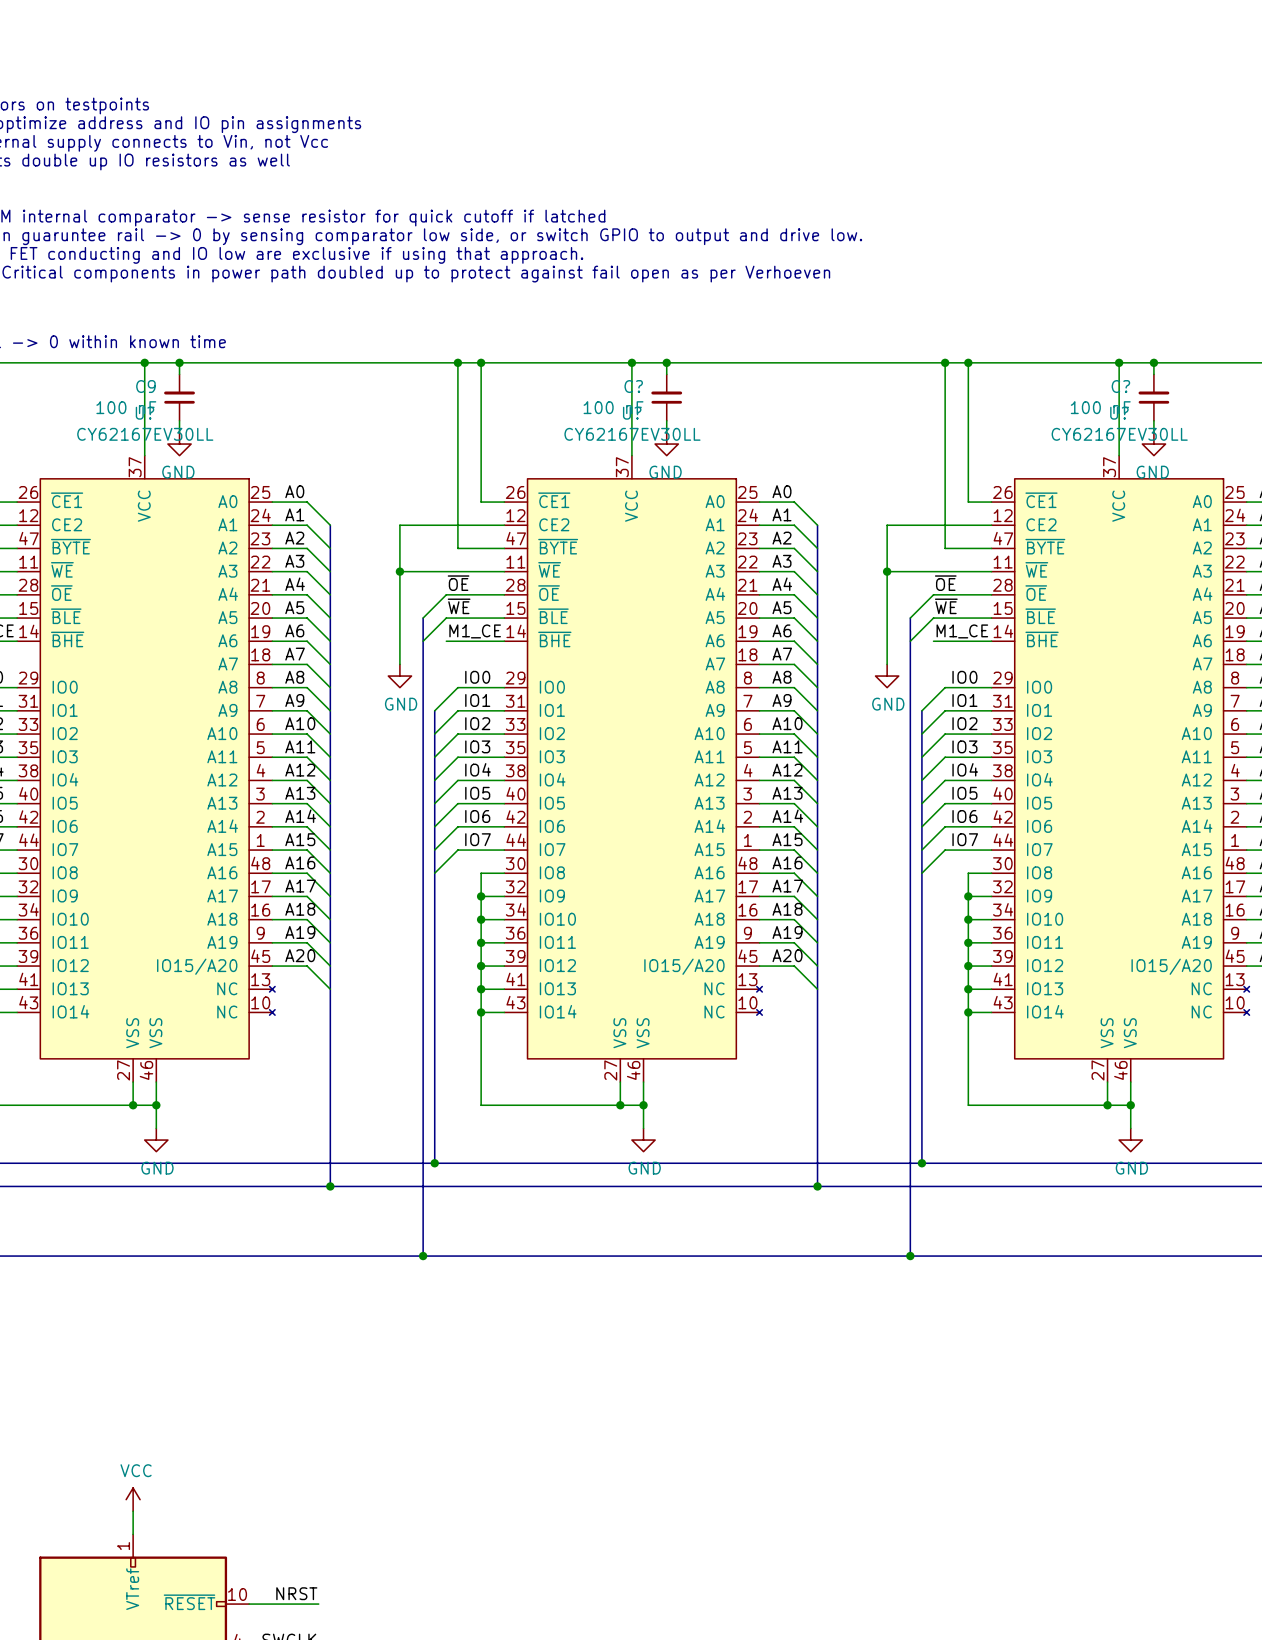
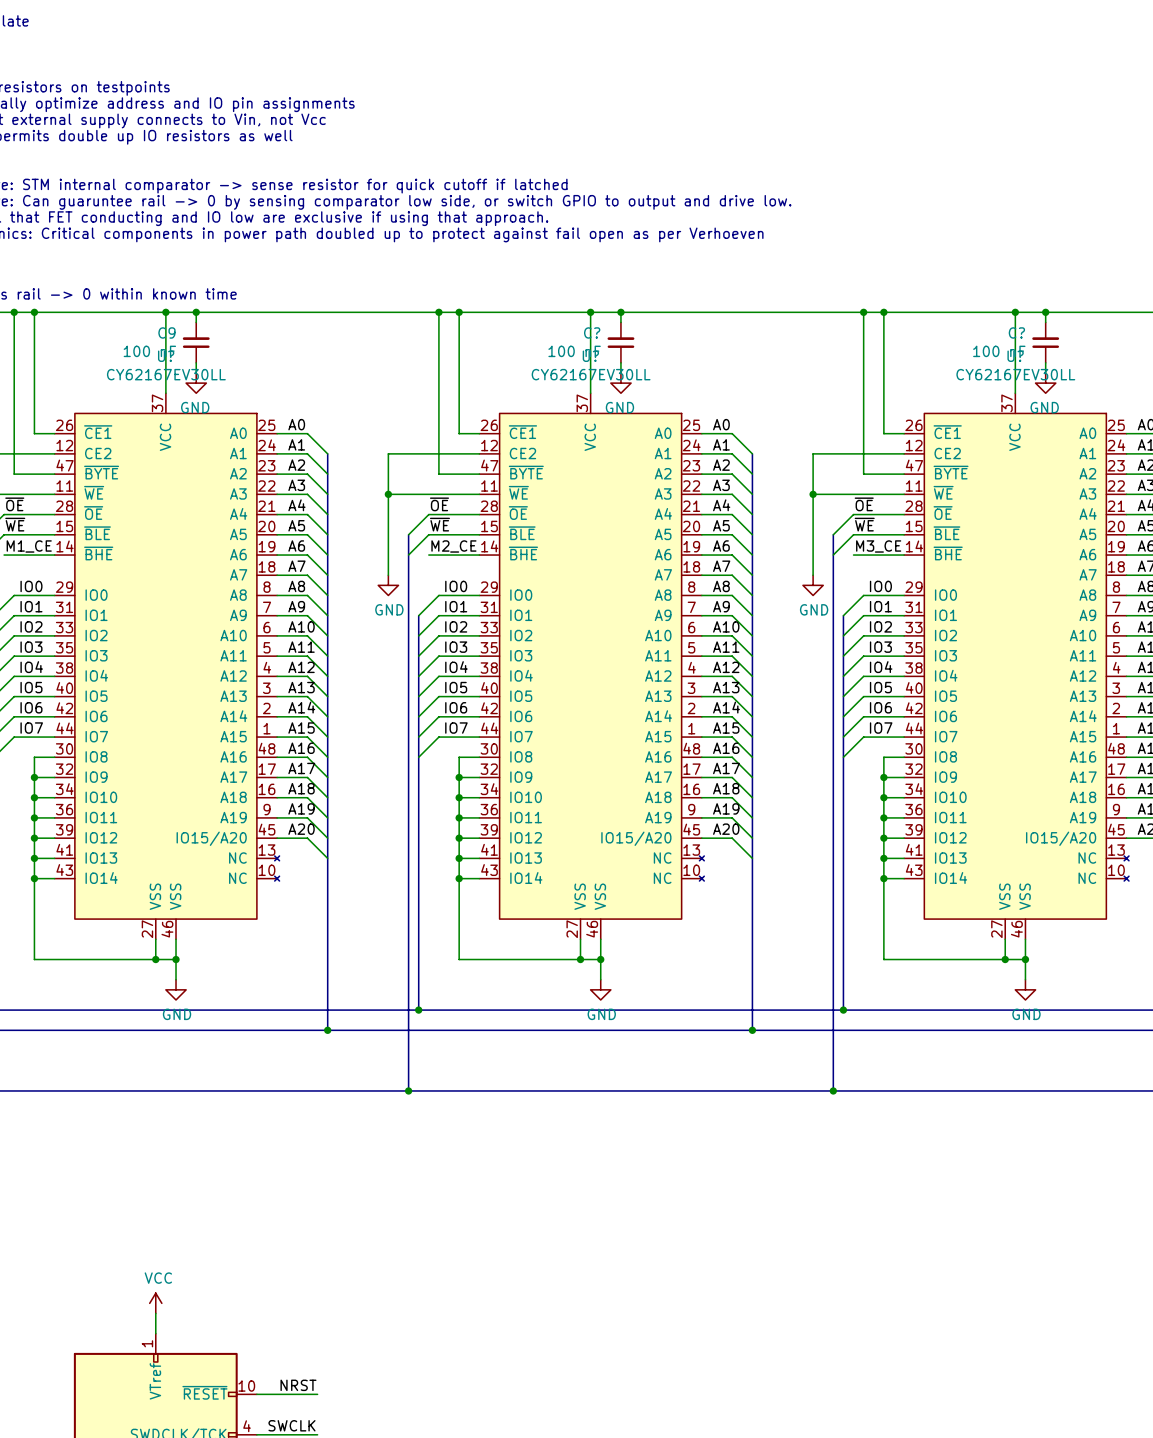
label: M1_CE (475, 631) -> M2_CE (453, 546)
label: M1_CE (962, 631) -> M3_CE (878, 546)

